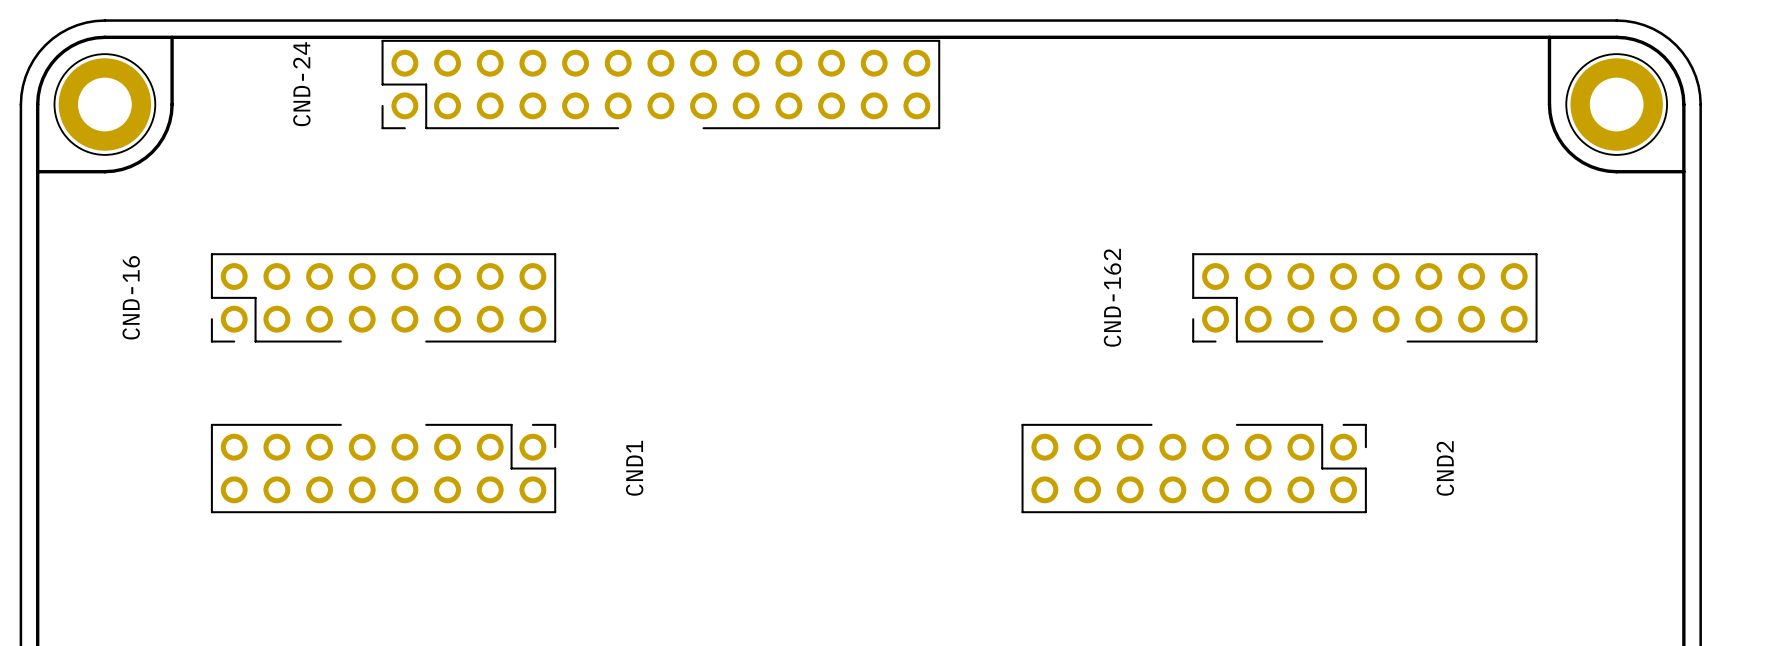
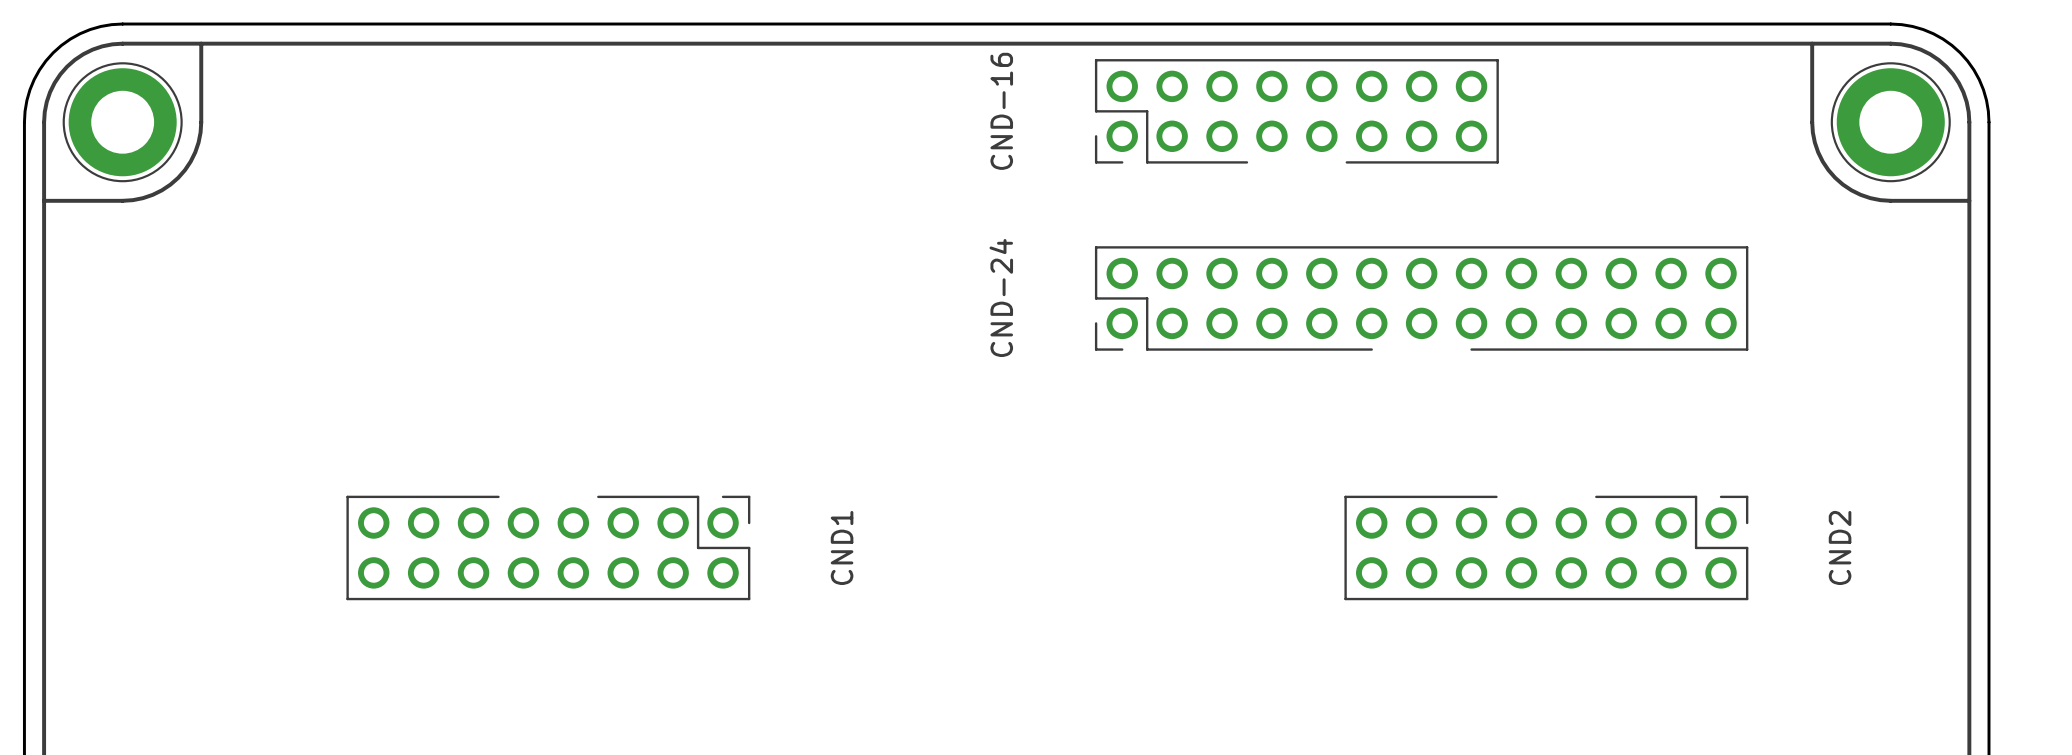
CND-24 position: (660, 84) -> (1421, 298)
CND-16 position: (383, 297) -> (1296, 111)
CND-162: (1364, 297) -> none
CND1 position: (383, 468) -> (548, 547)
CND2 position: (1194, 468) -> (1546, 547)

